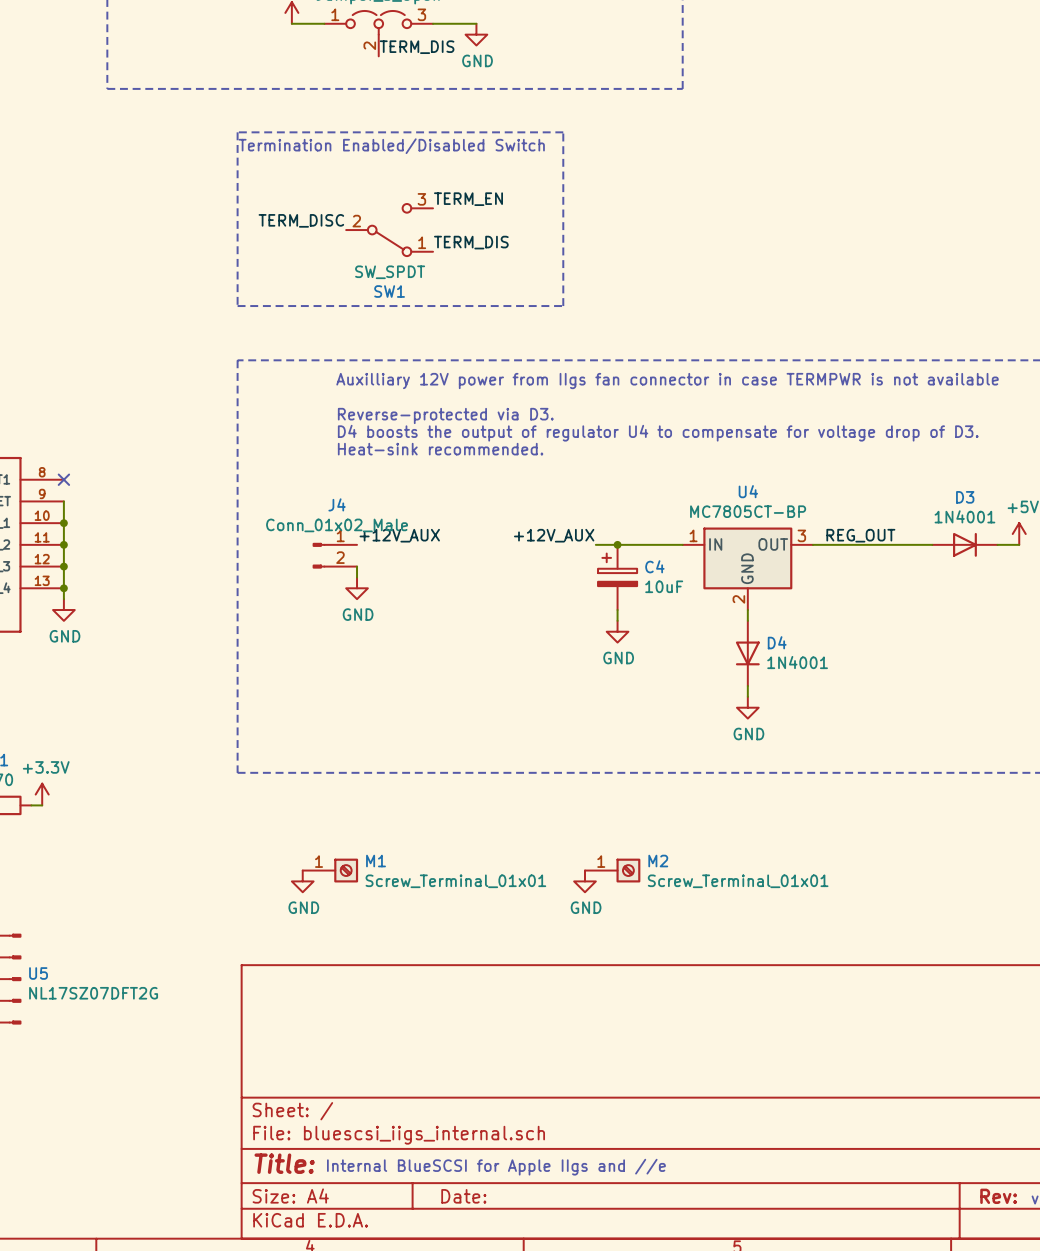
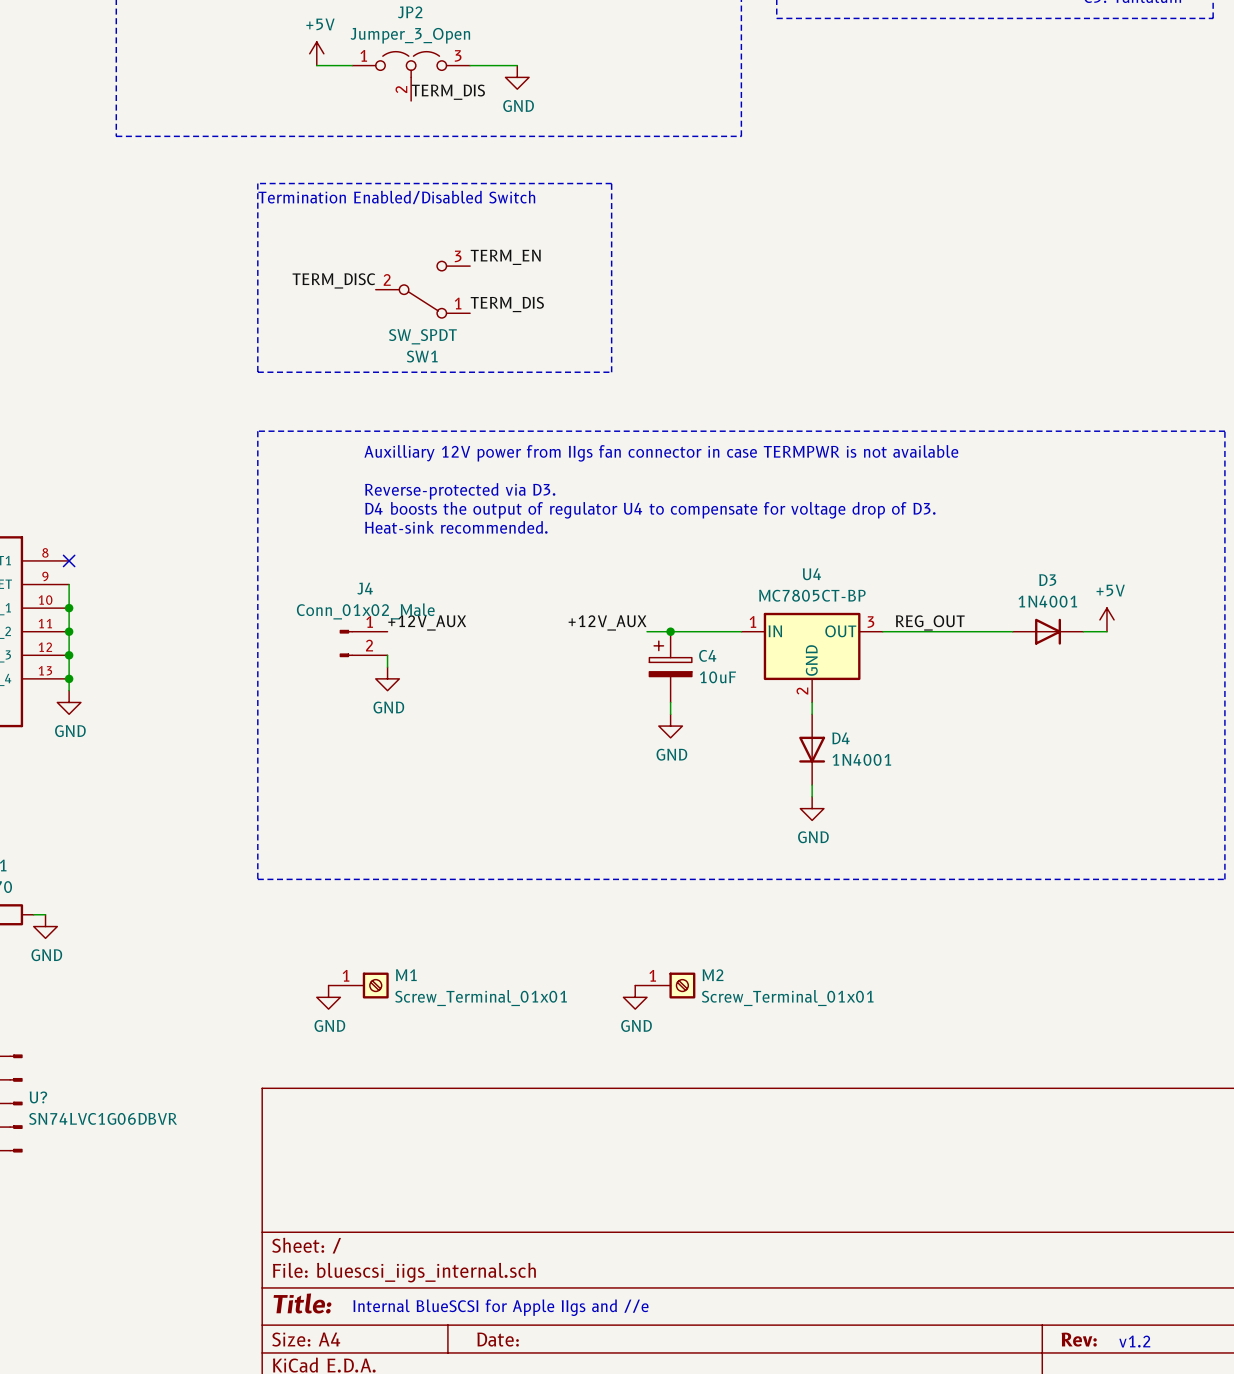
power symbol: +3.3V (42, 794) -> none
power symbol: none -> GND (45, 926)
U5 name: U5 (38, 973) -> U? (38, 1097)
U5 value: NL17SZ07DFT2G (93, 993) -> SN74LVC1G06DBVR (103, 1118)

